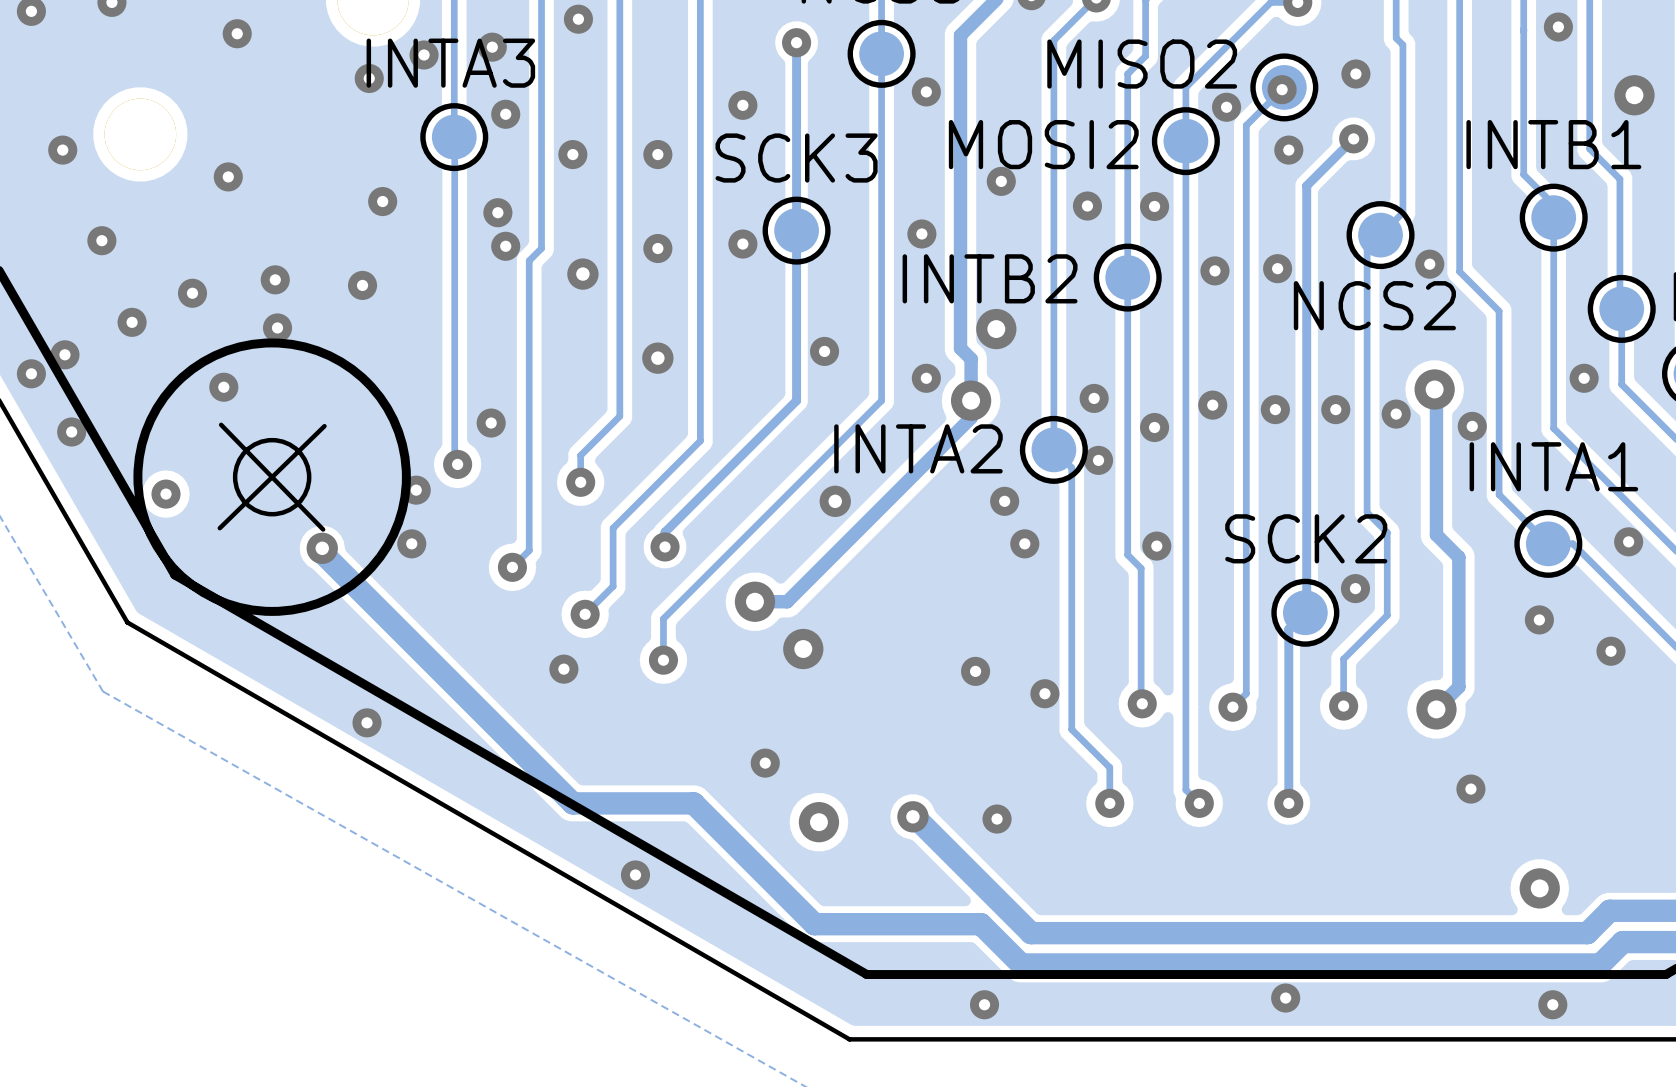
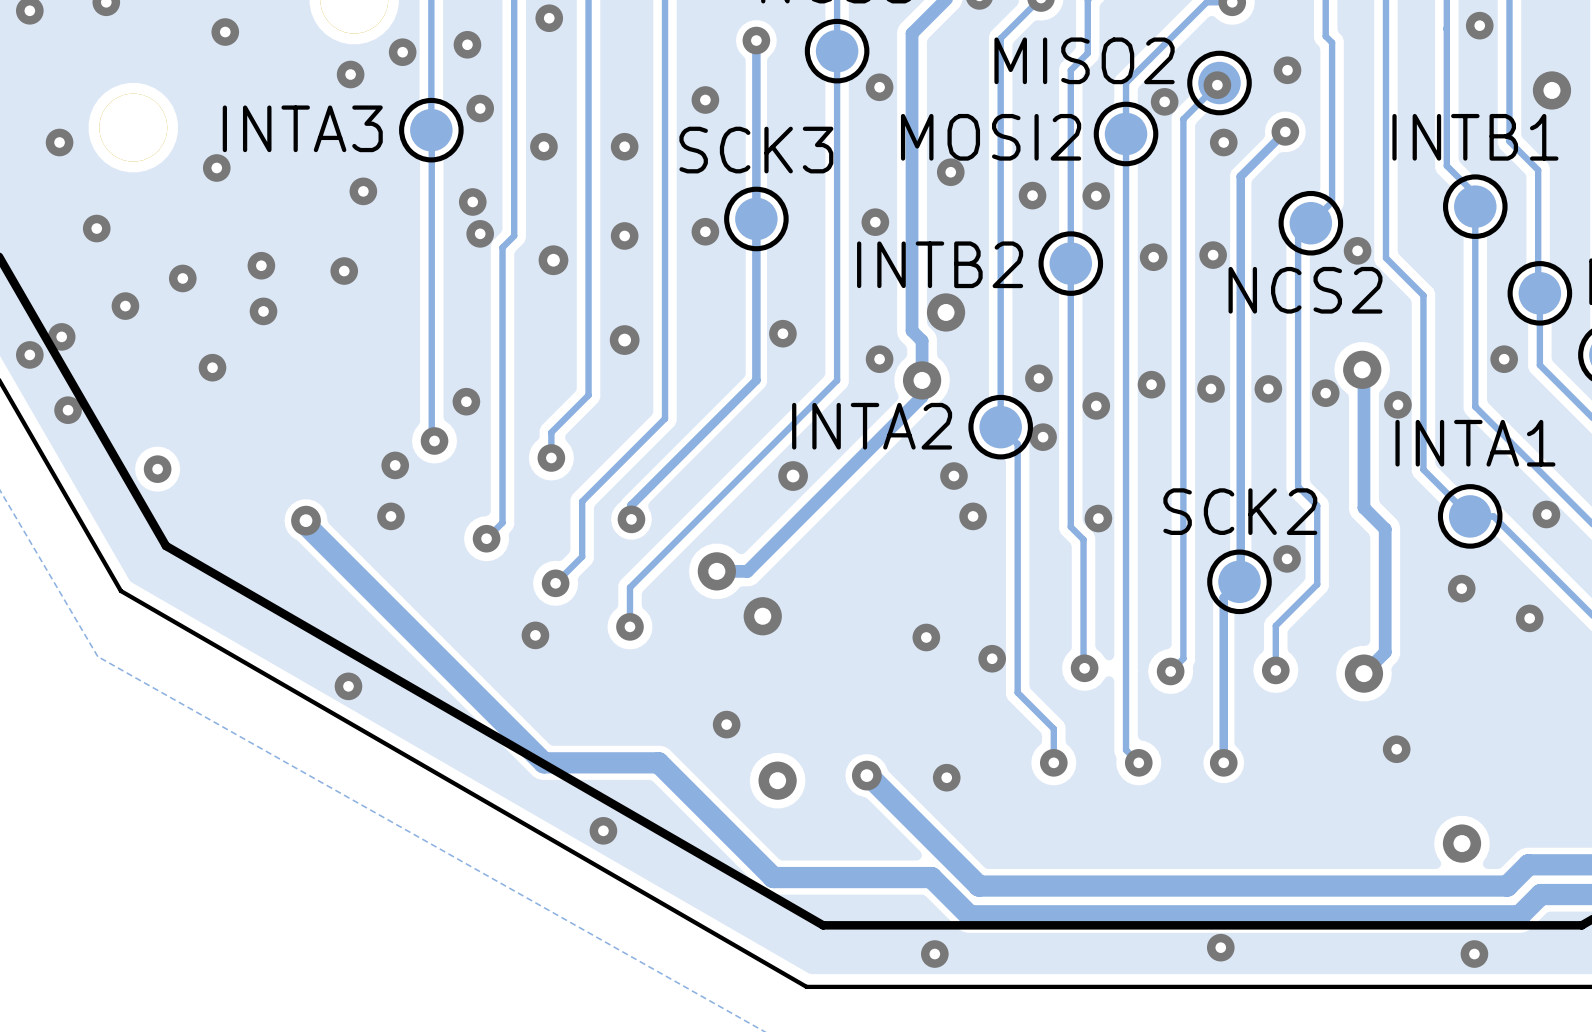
text position: INTA3 (450, 63) -> INTA3 (302, 128)
drawing: [133, 338, 411, 616] -> none
line: (221, 424) (323, 529) -> none
line: (324, 426) (219, 528) -> none

